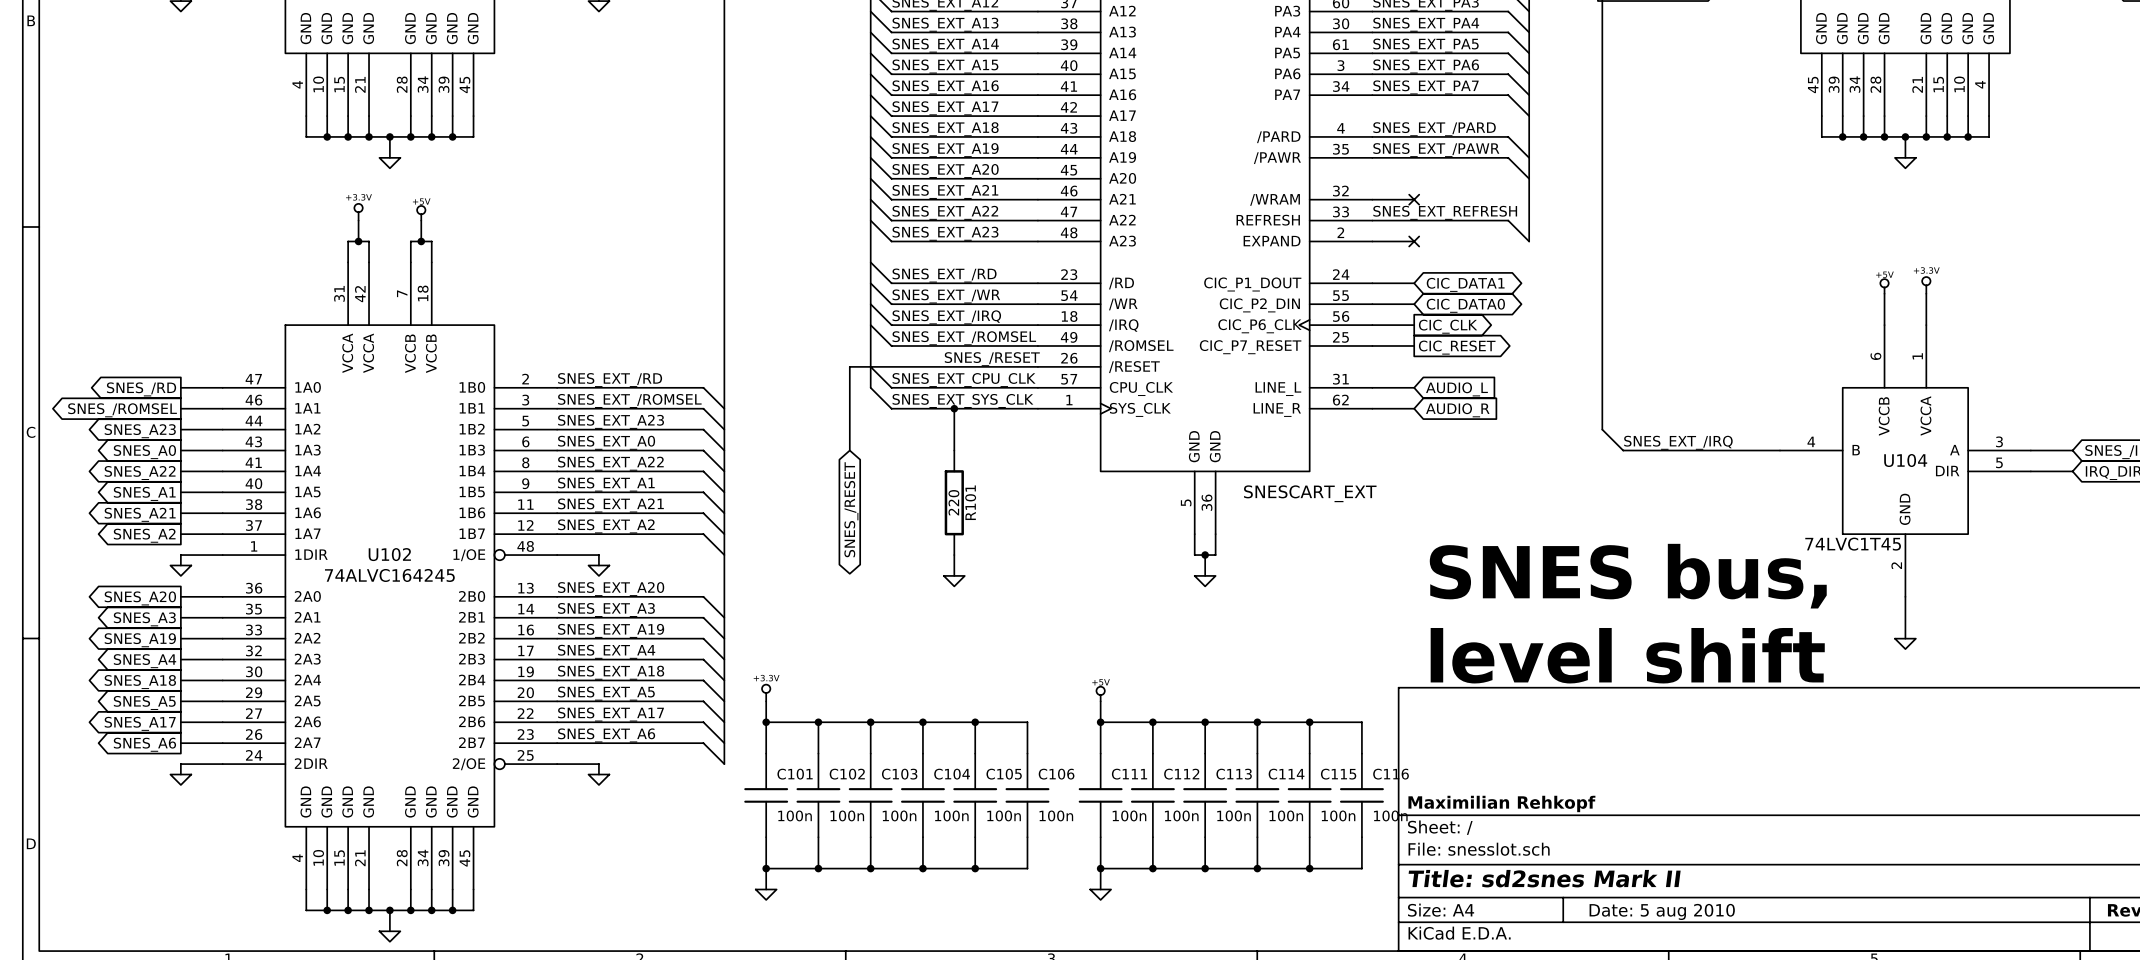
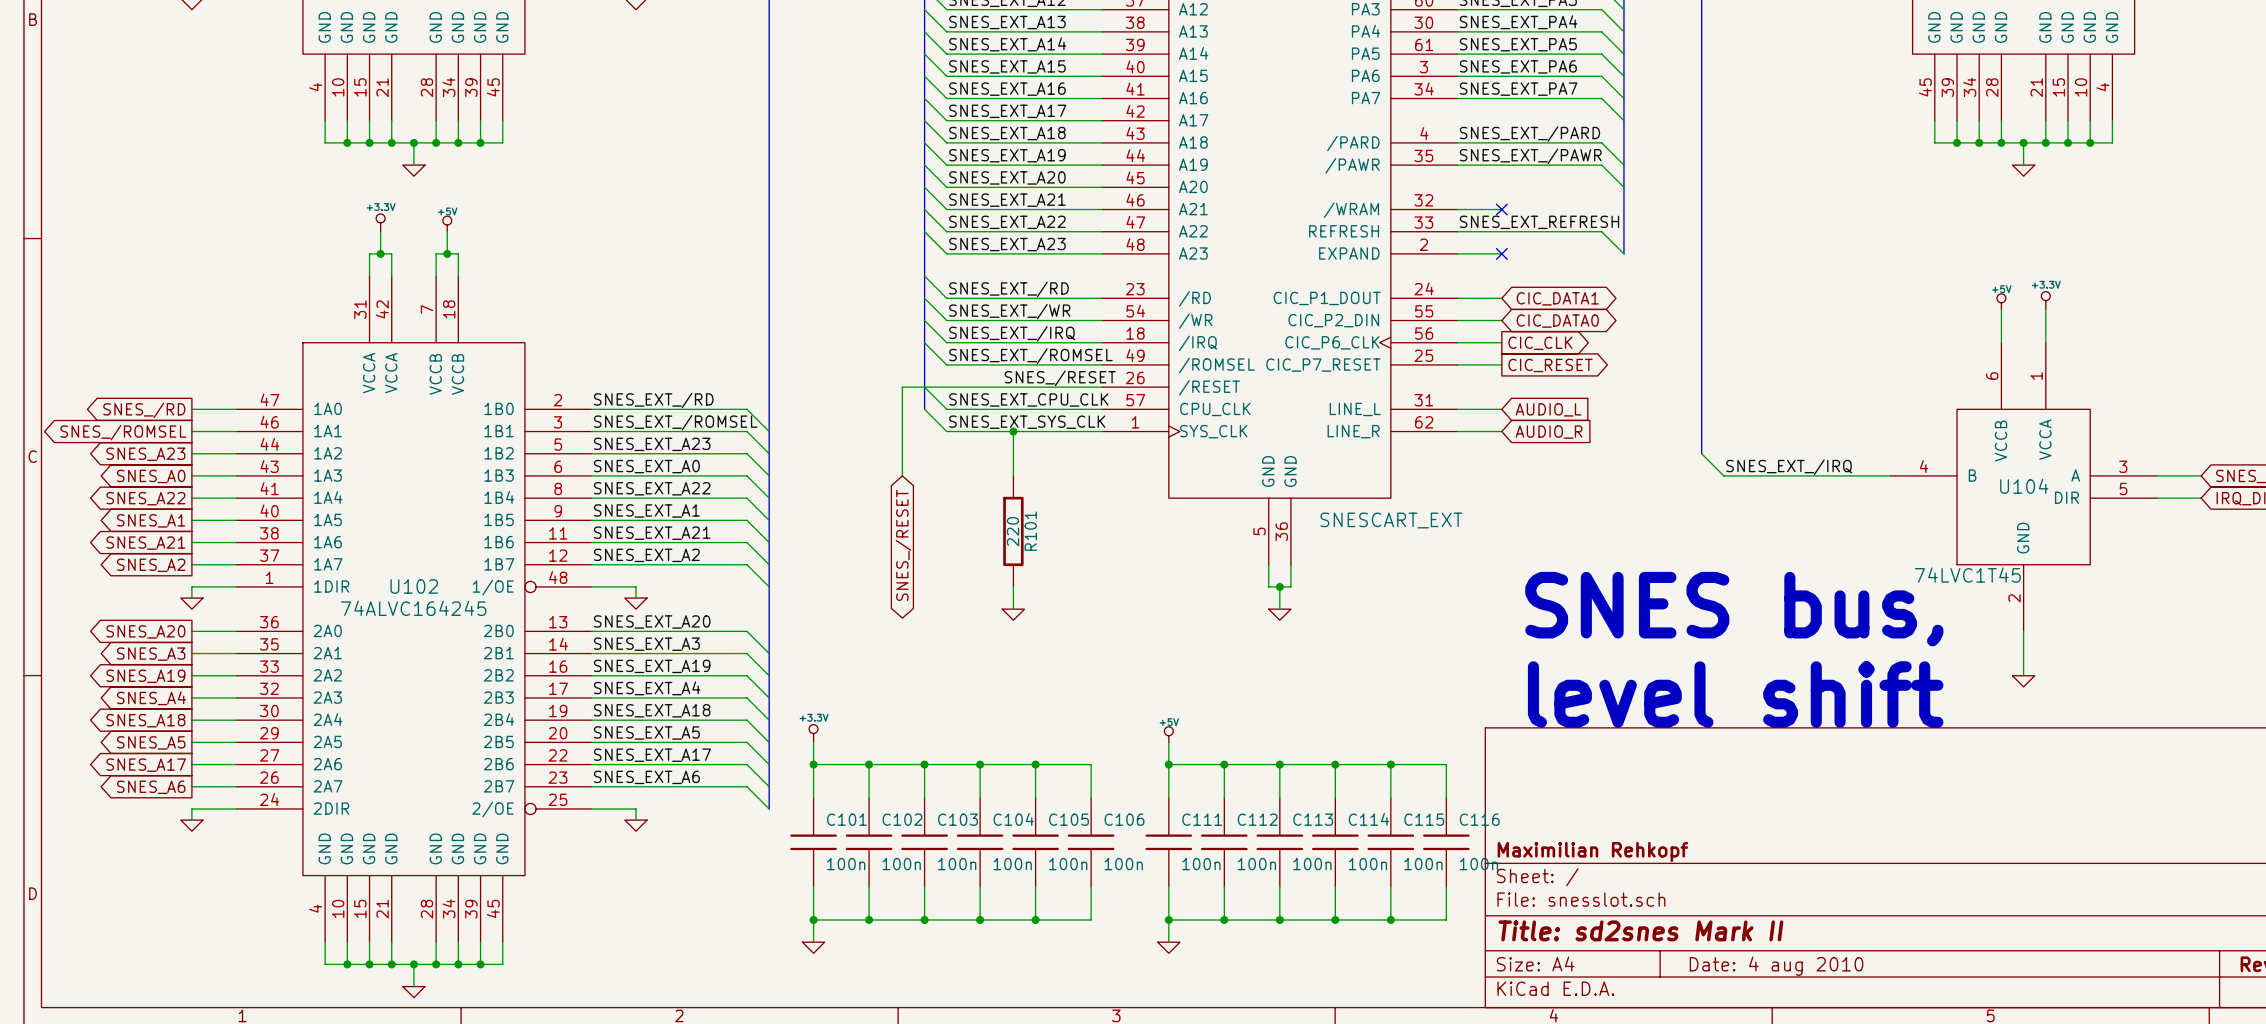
title block: Date: 5 aug 2010 (1662, 911) -> Date: 4 aug 2010 (1776, 966)

